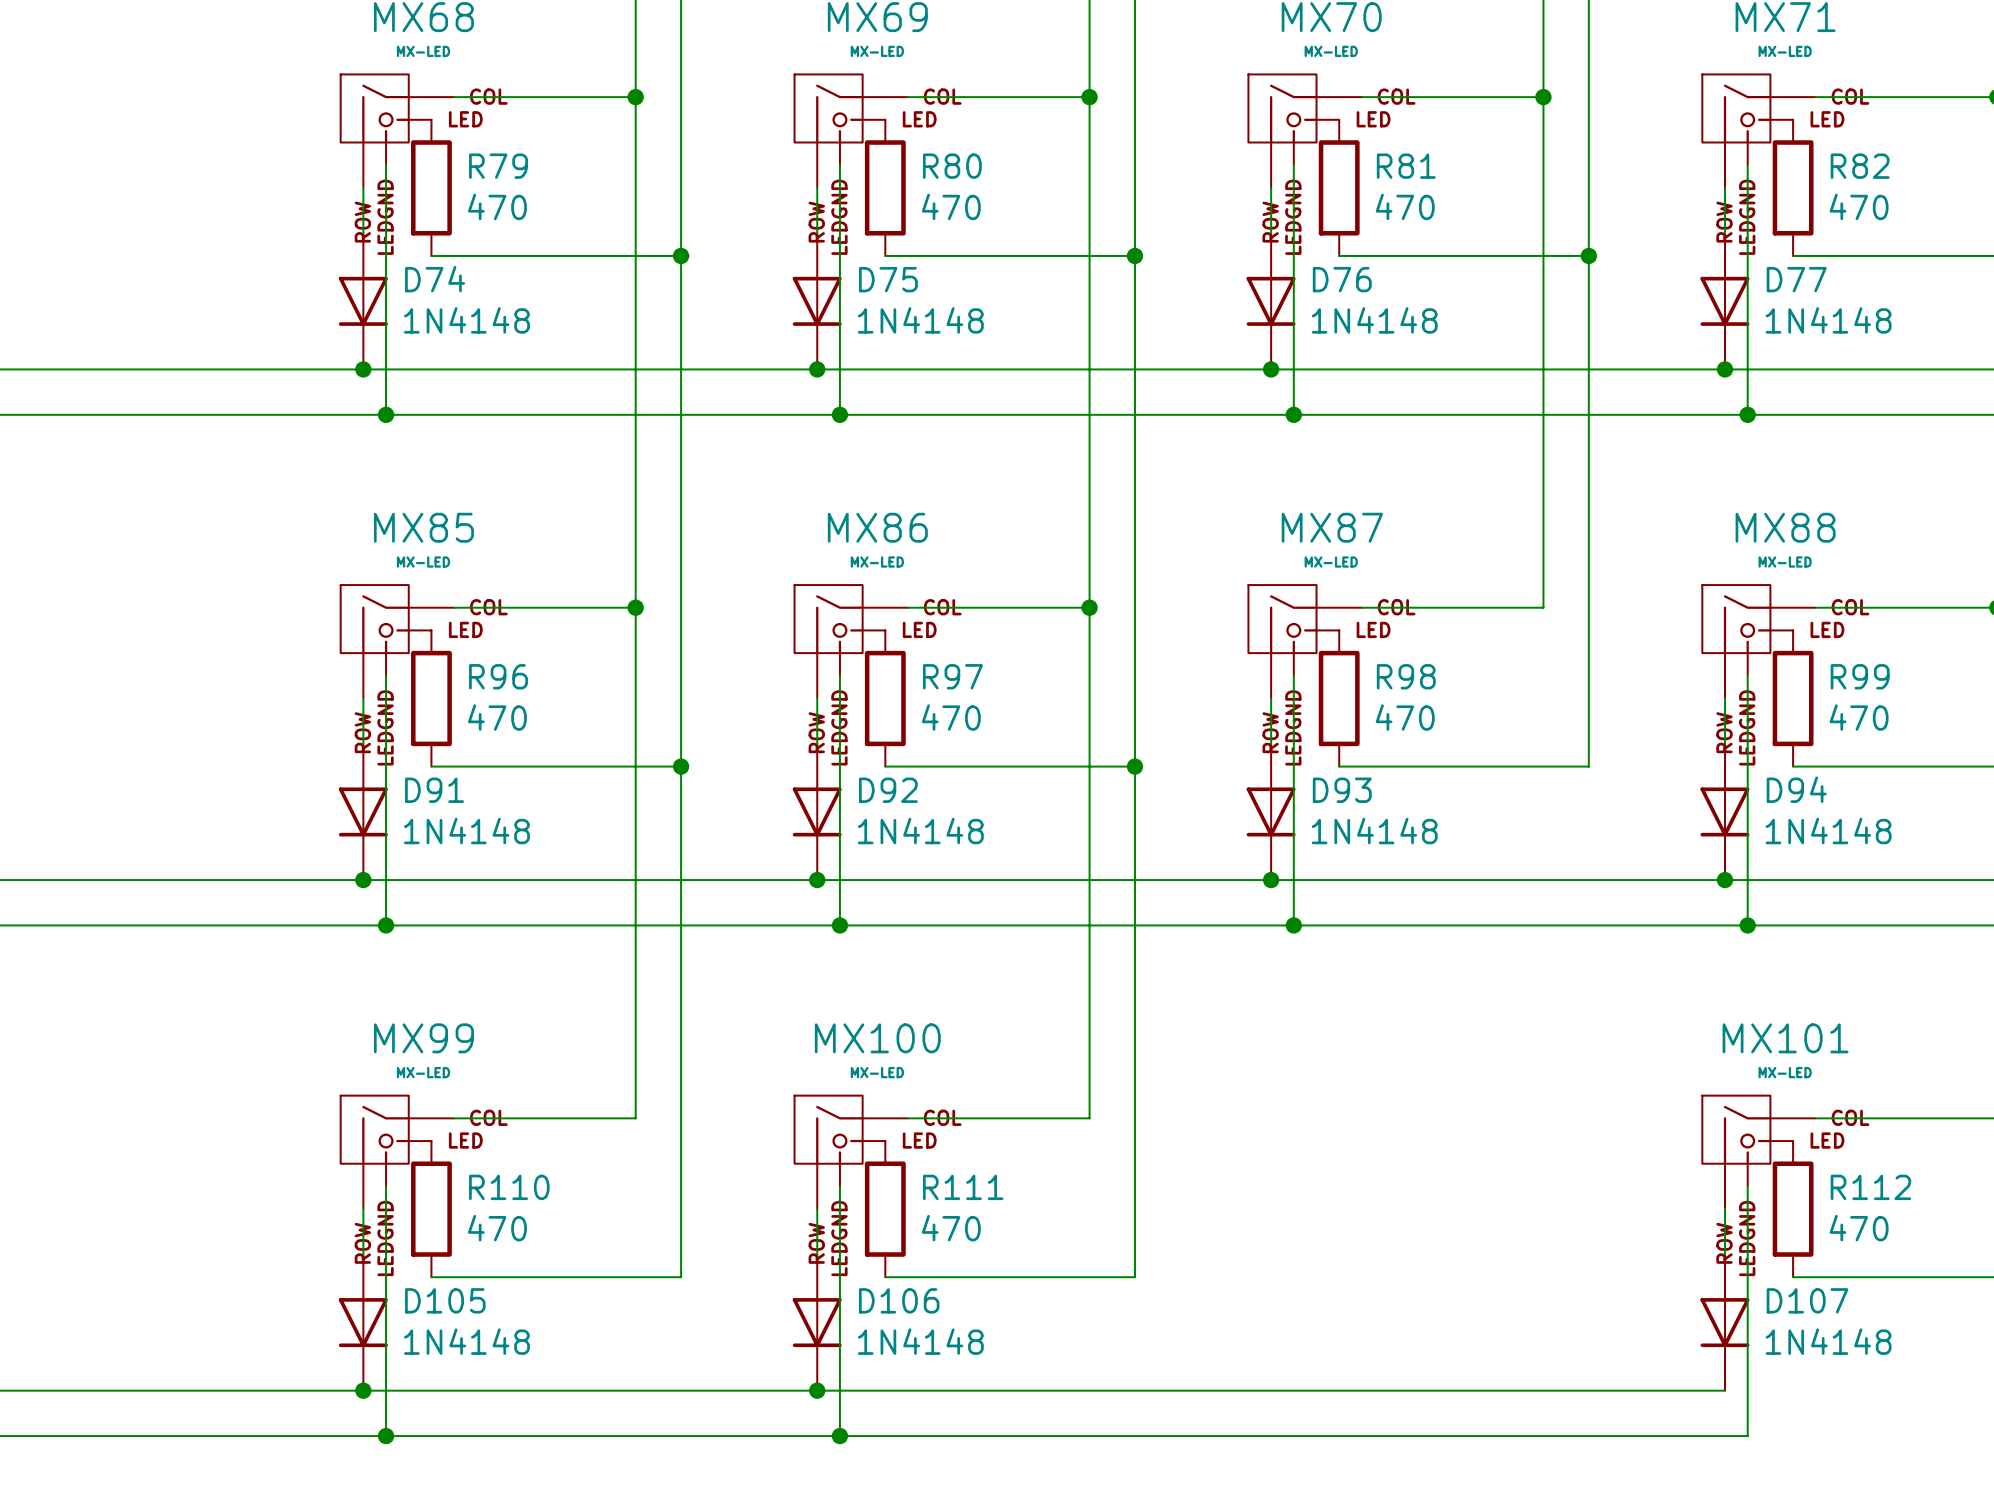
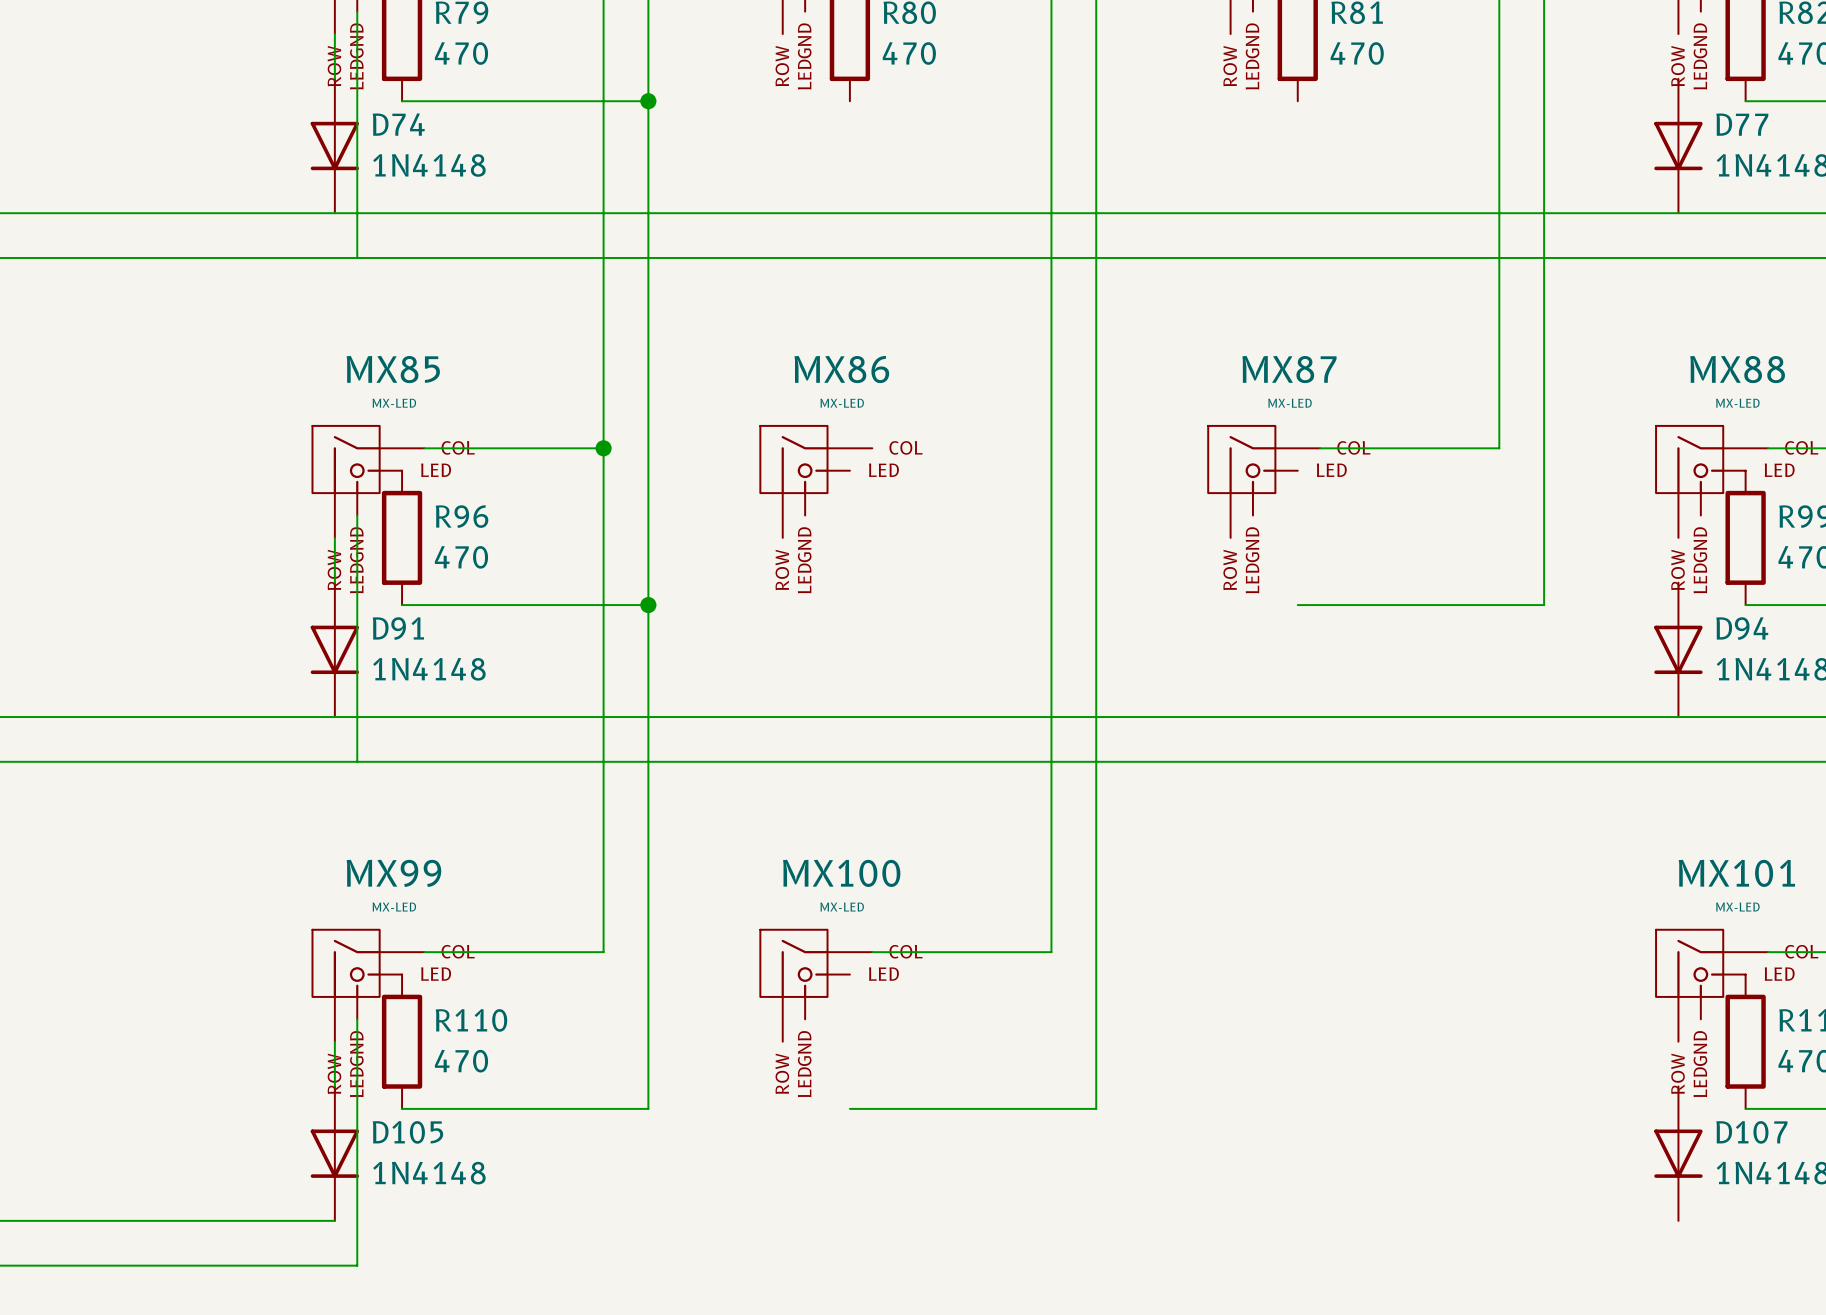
wire: (839, 165) (839, 414) -> none
wire: (1293, 165) (1293, 414) -> none
wire: (1747, 165) (1747, 414) -> none
wire: (817, 187) (817, 233) -> none
wire: (1271, 187) (1271, 233) -> none
wire: (1725, 187) (1725, 233) -> none
wire: (885, 255) (1134, 255) -> none
junction: (1134, 255) -> none
wire: (1339, 255) (1588, 255) -> none
junction: (1588, 255) -> none
D75: 1N4148 (817, 301) -> none
D76: 1N4148 (1271, 301) -> none
junction: (363, 369) -> none
junction: (817, 369) -> none
junction: (1271, 369) -> none
junction: (1725, 369) -> none
junction: (386, 414) -> none
junction: (839, 414) -> none
junction: (1293, 414) -> none
junction: (1747, 414) -> none
wire: (908, 607) (1089, 607) -> none
junction: (1089, 607) -> none
wire: (839, 675) (839, 925) -> none
wire: (1293, 675) (1293, 925) -> none
wire: (1747, 675) (1747, 925) -> none
wire: (817, 698) (817, 743) -> none
R97: 470 (885, 698) -> none
wire: (1271, 698) (1271, 743) -> none
R98: 470 (1339, 698) -> none
wire: (1725, 698) (1725, 743) -> none
wire: (885, 766) (1134, 766) -> none
junction: (1134, 766) -> none
D92: 1N4148 (817, 811) -> none
D93: 1N4148 (1271, 811) -> none
junction: (363, 880) -> none
junction: (817, 880) -> none
junction: (1271, 880) -> none
junction: (1725, 880) -> none
junction: (386, 925) -> none
junction: (839, 925) -> none
junction: (1293, 925) -> none
junction: (1747, 925) -> none
wire: (839, 1186) (839, 1436) -> none
wire: (1747, 1186) (1747, 1436) (386, 1436) -> none
wire: (817, 1209) (817, 1254) -> none
R111: 470 (885, 1209) -> none
wire: (1725, 1209) (1725, 1254) -> none
D106: 1N4148 (817, 1322) -> none
wire: (363, 1390) (1725, 1390) -> none
junction: (363, 1390) -> none
junction: (817, 1390) -> none
junction: (386, 1436) -> none
junction: (839, 1436) -> none

